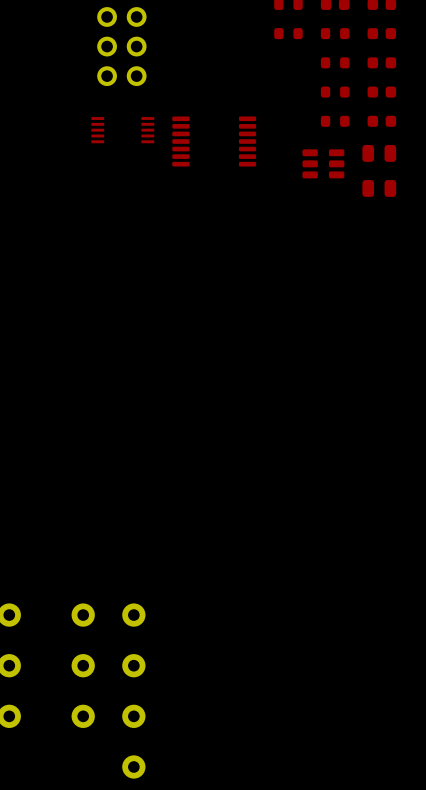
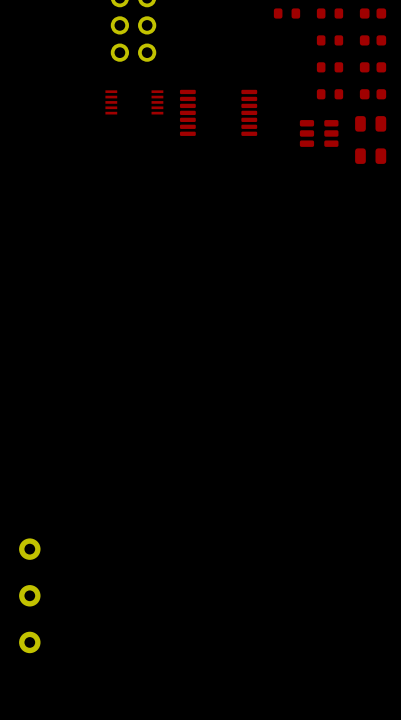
part: (83, 615) -> none
part: (133, 615) -> none
part: (83, 665) -> none
part: (133, 665) -> none
part: (83, 716) -> none
part: (133, 716) -> none
part: (133, 766) -> none

